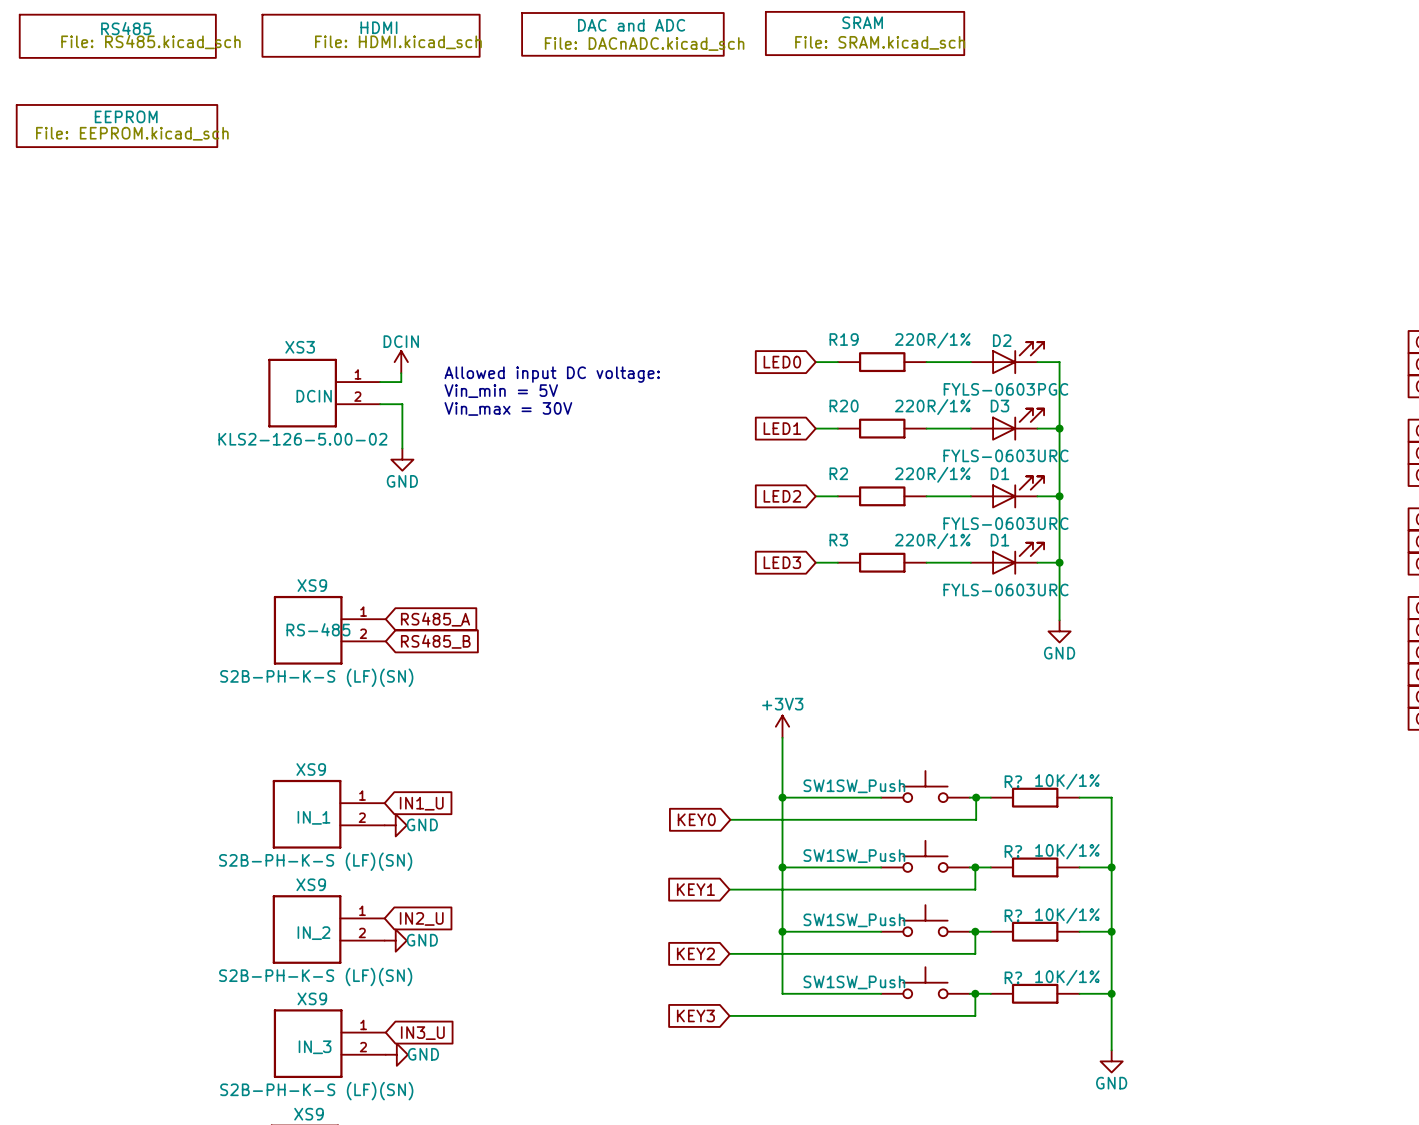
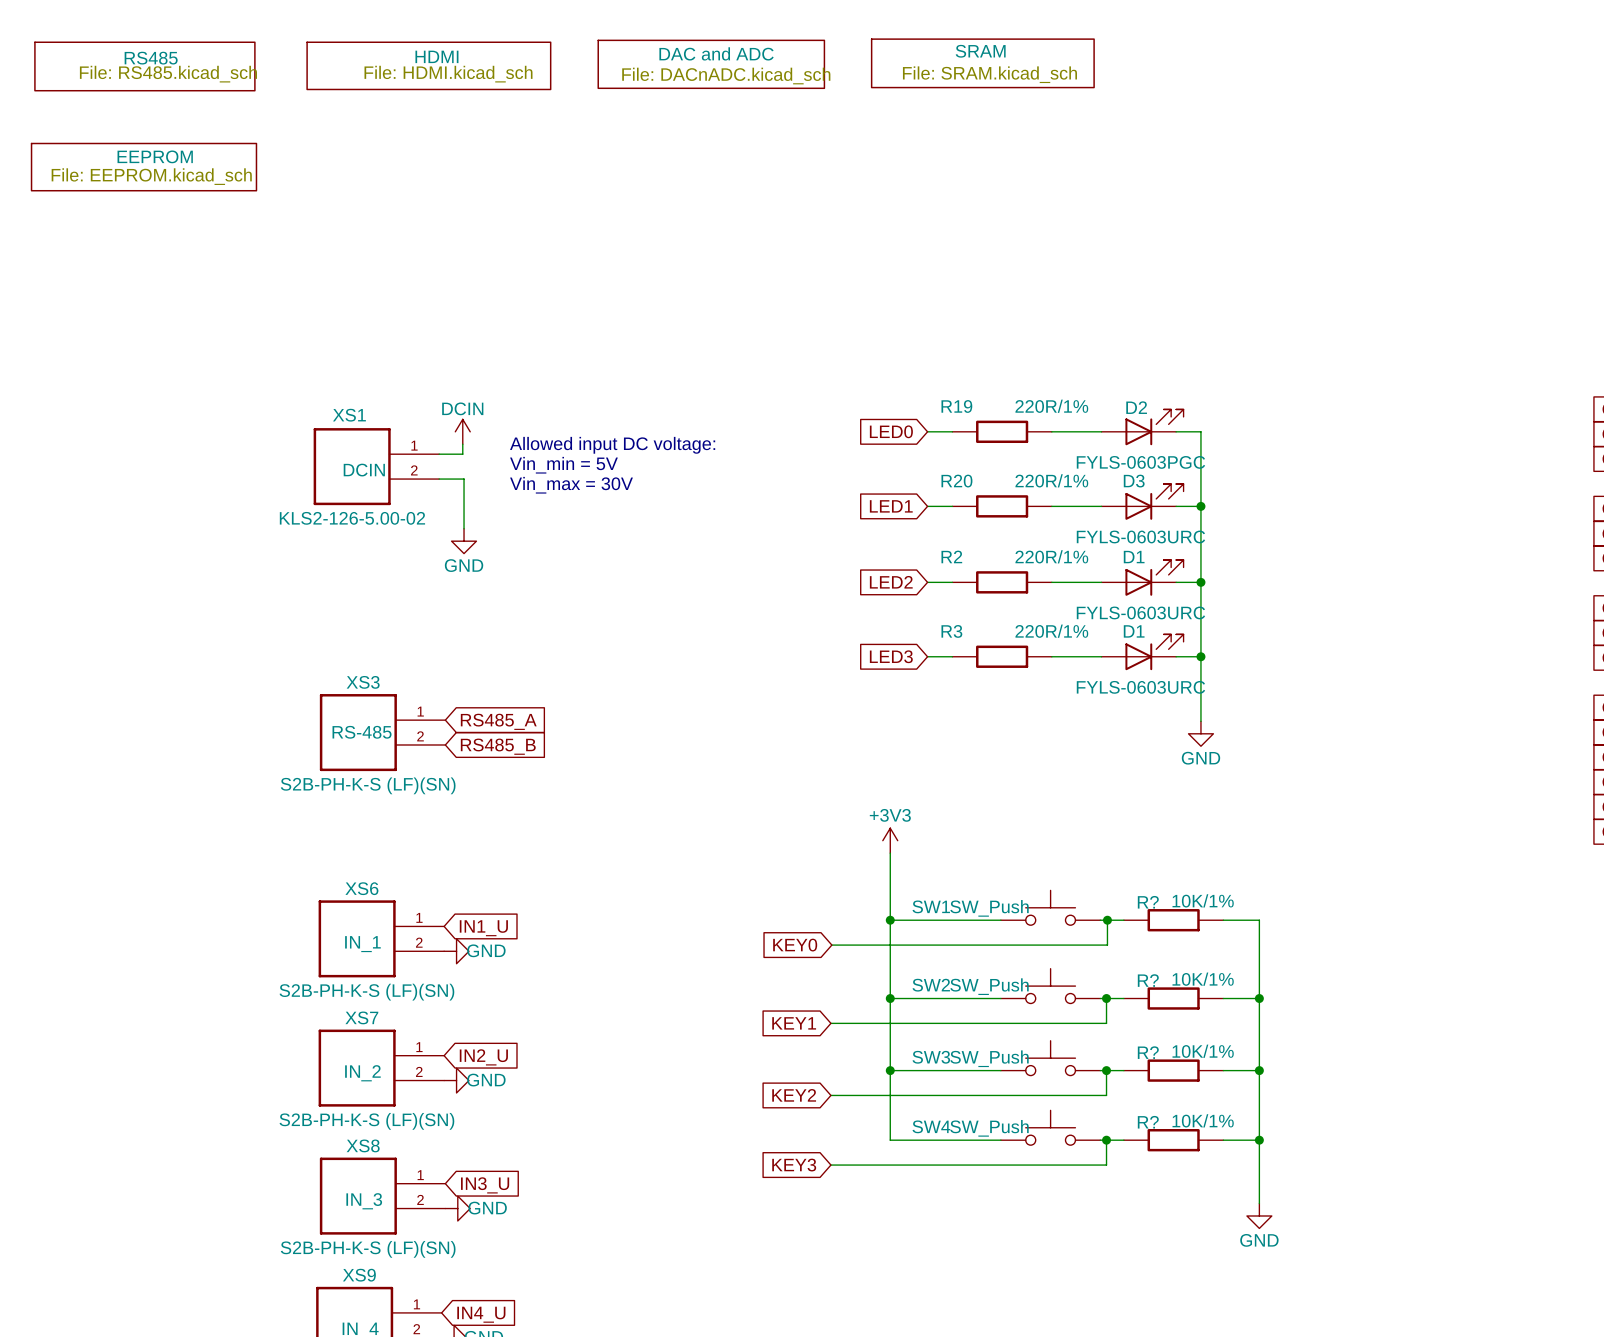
XS3 name: XS3 (300, 347) -> XS1 (349, 415)
XS9 name: XS9 (312, 585) -> XS3 (363, 682)
XS9 name: XS9 (311, 769) -> XS6 (361, 888)
SW1 name: SW1 (819, 855) -> SW2 (931, 985)
XS9 name: XS9 (311, 884) -> XS7 (361, 1017)
SW1 name: SW1 (819, 919) -> SW3 (931, 1057)
SW1 name: SW1 (819, 981) -> SW4 (931, 1126)
XS9 name: XS9 (312, 998) -> XS8 (363, 1145)

